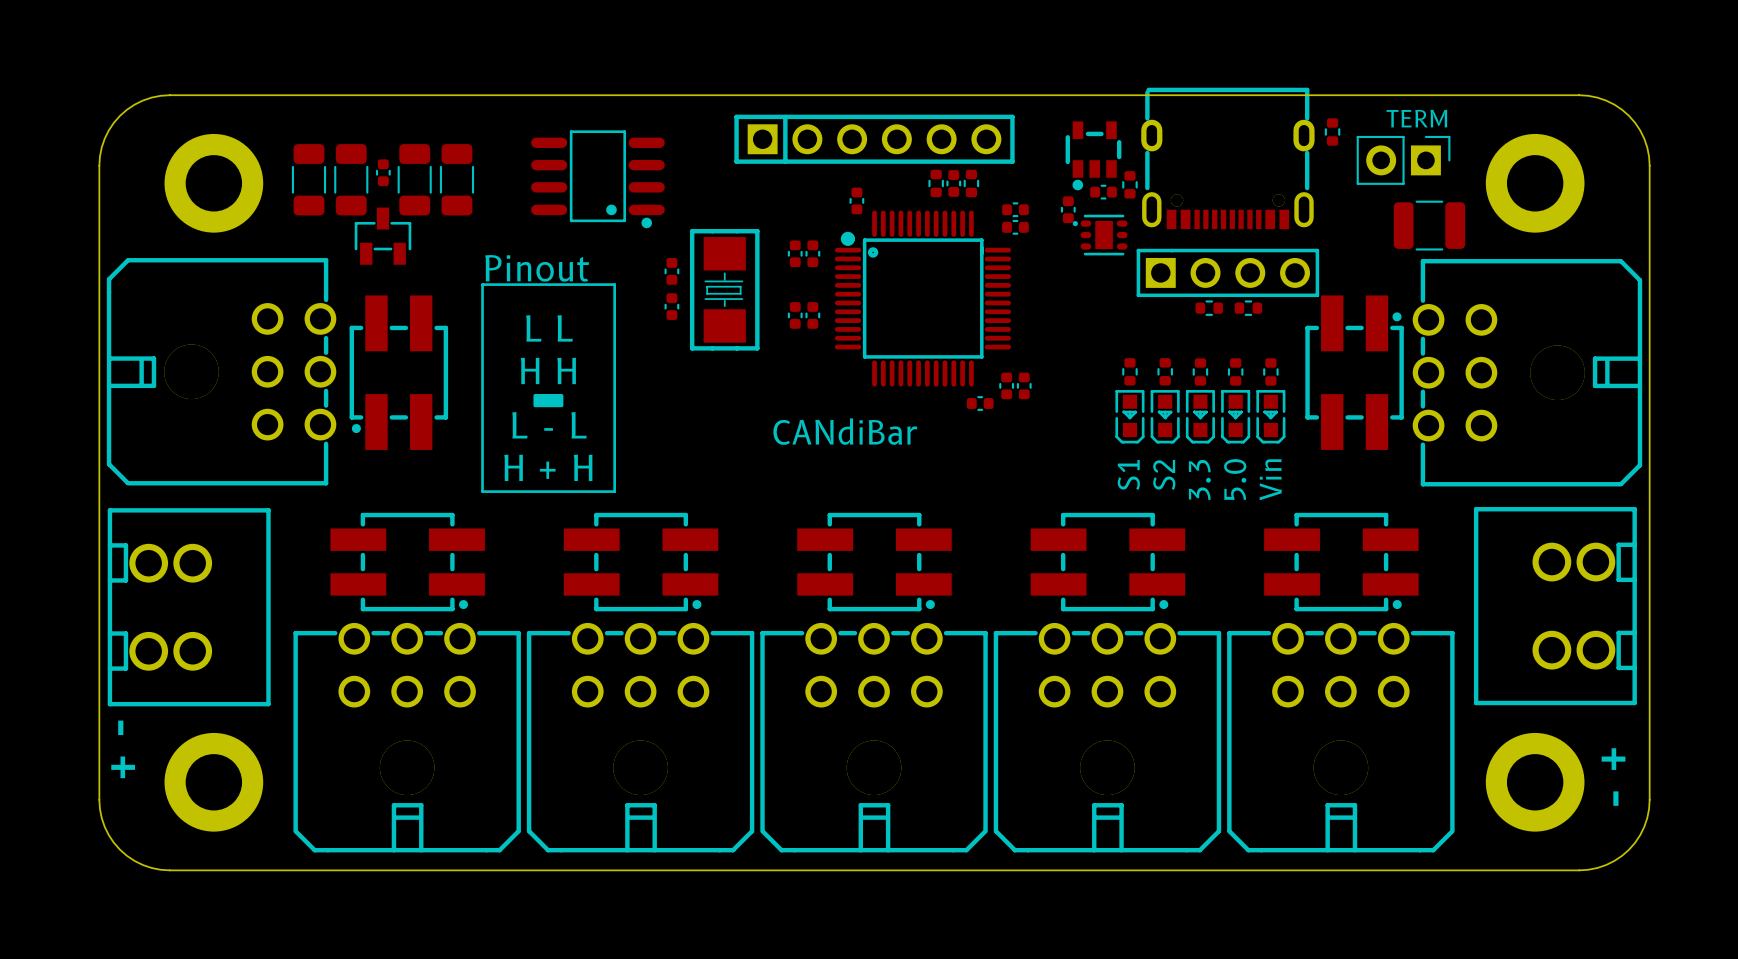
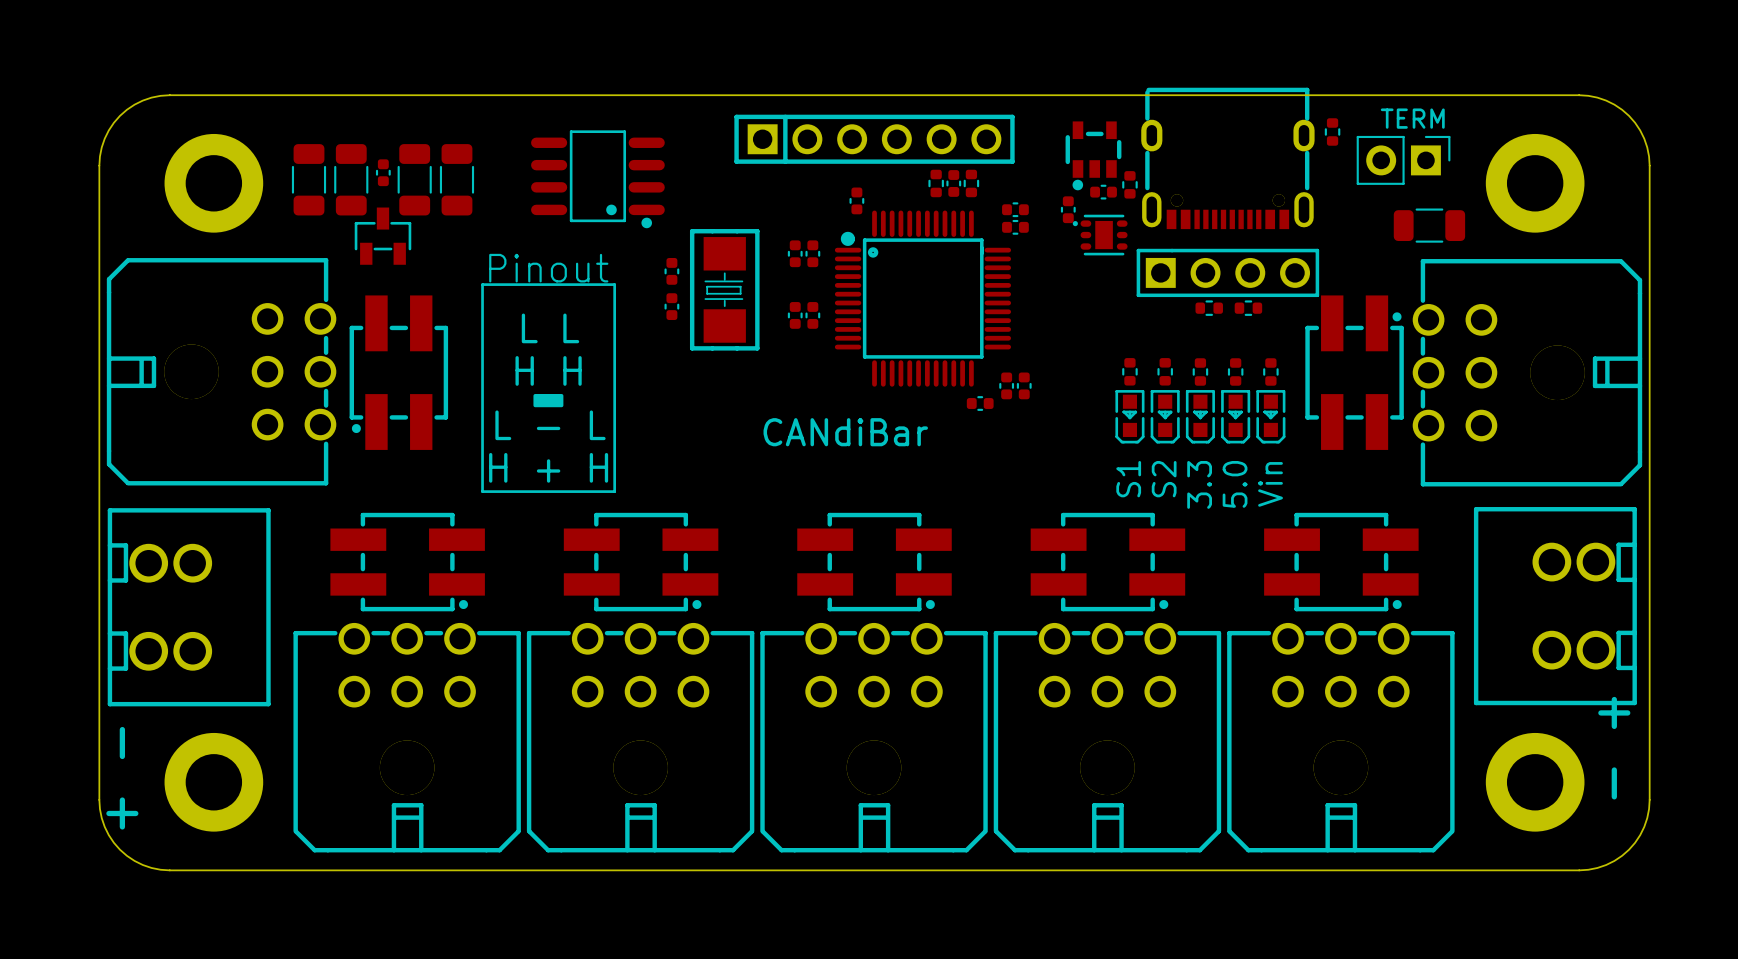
part footprint: [1393, 200, 1466, 251] -> [1393, 208, 1466, 243]

